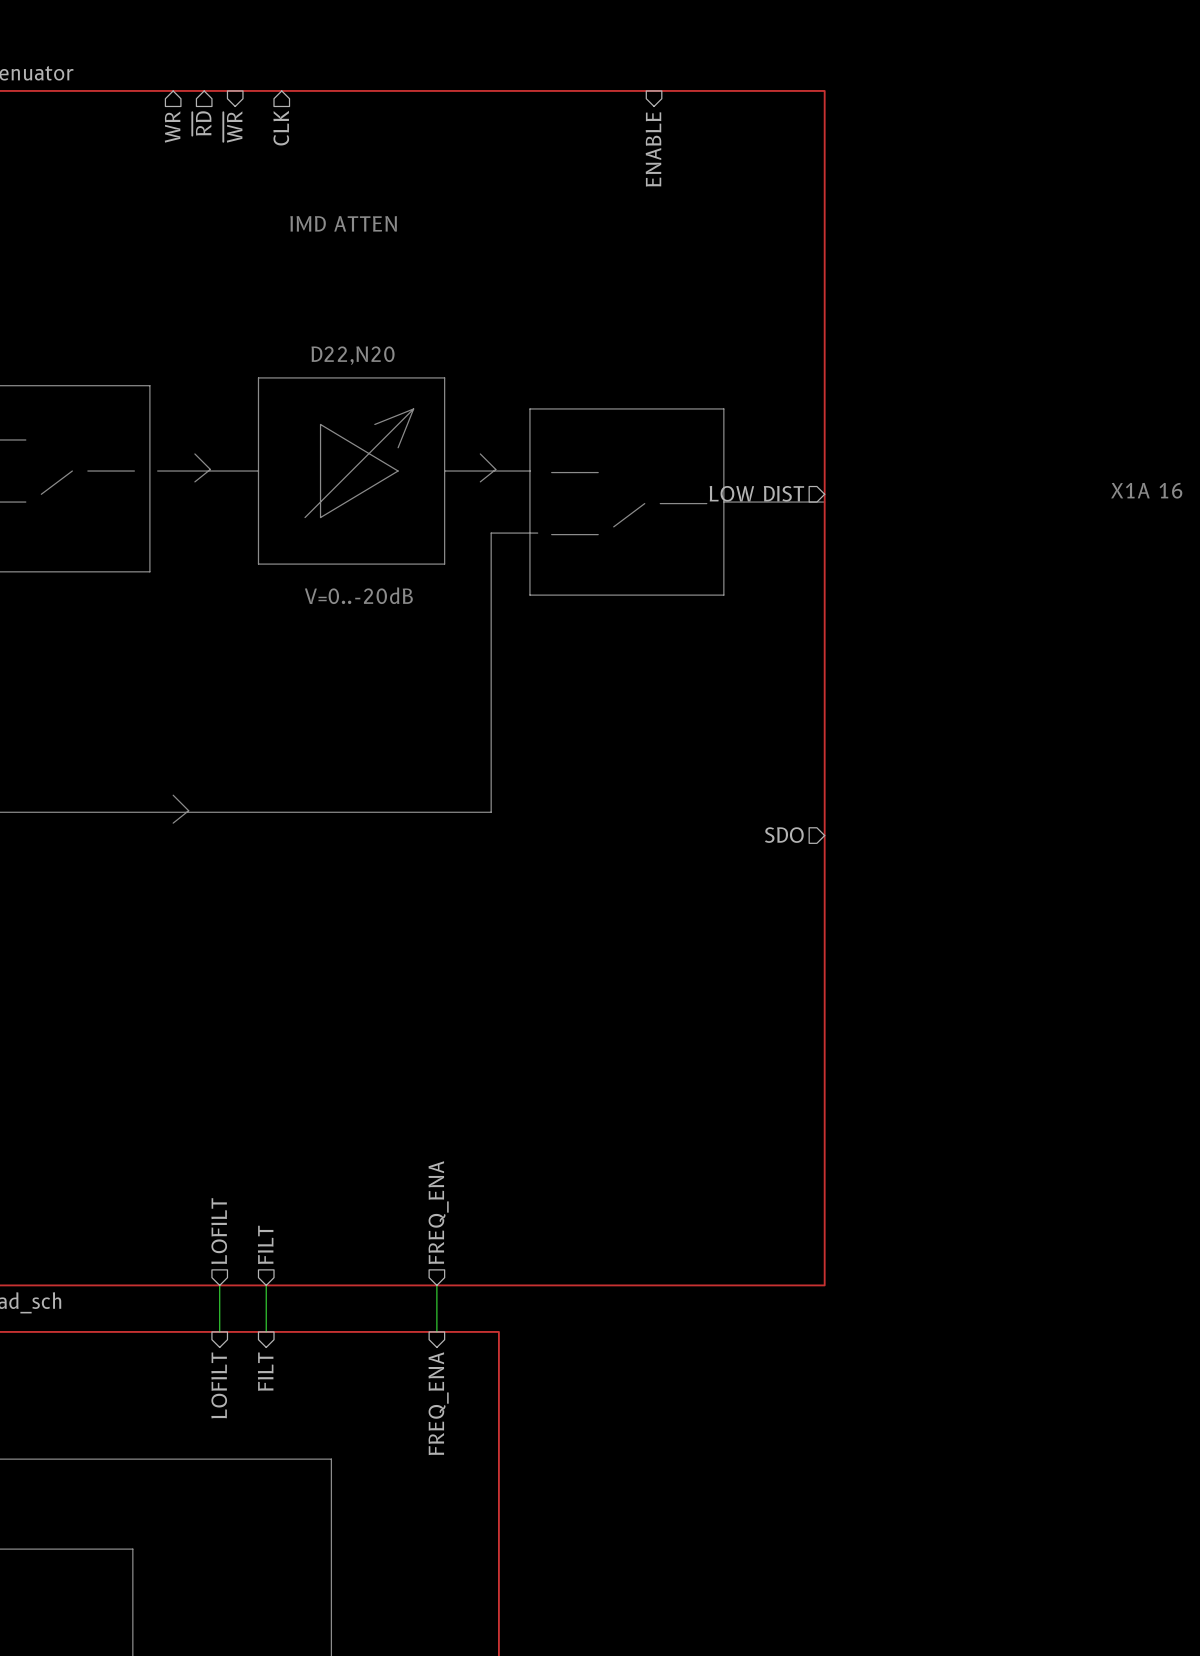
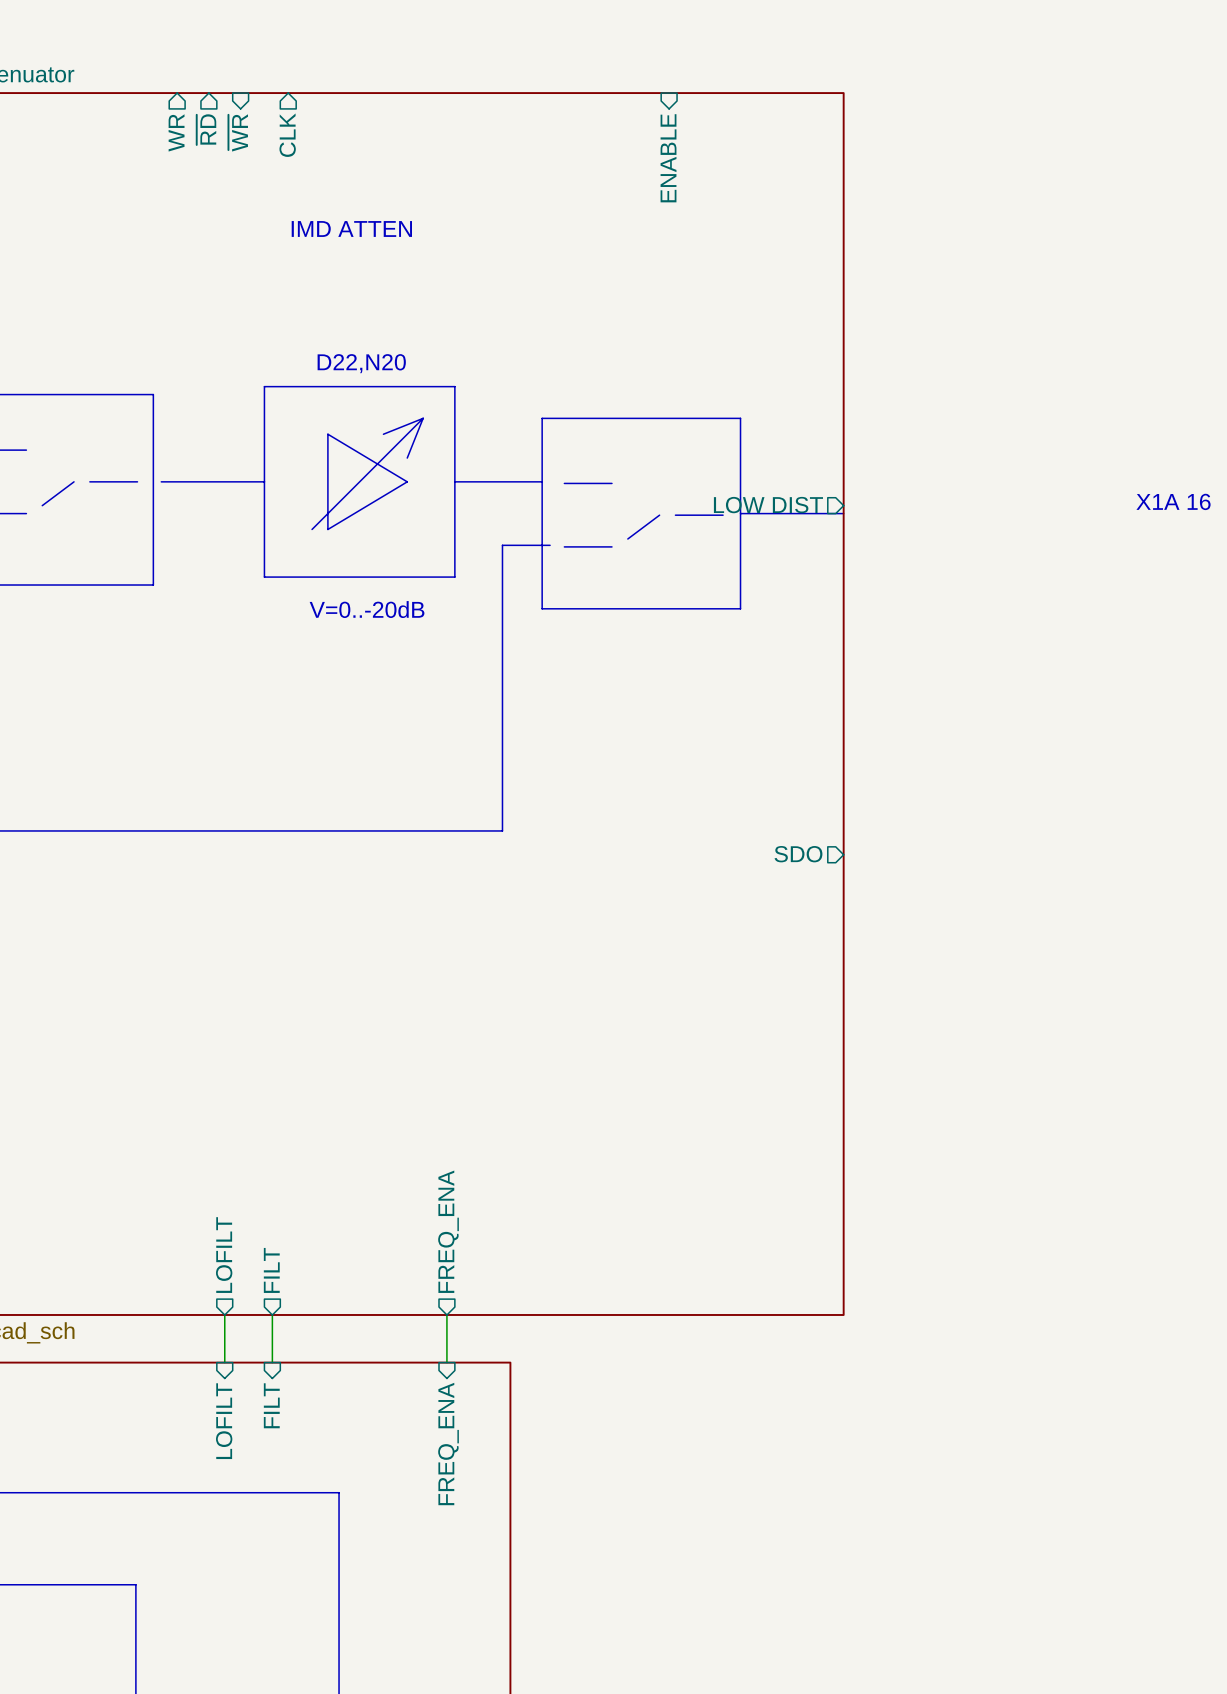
line: (194, 453) (210, 469) (194, 481) -> none
line: (480, 453) (495, 469) (480, 481) -> none
line: (173, 795) (188, 810) (173, 823) -> none

